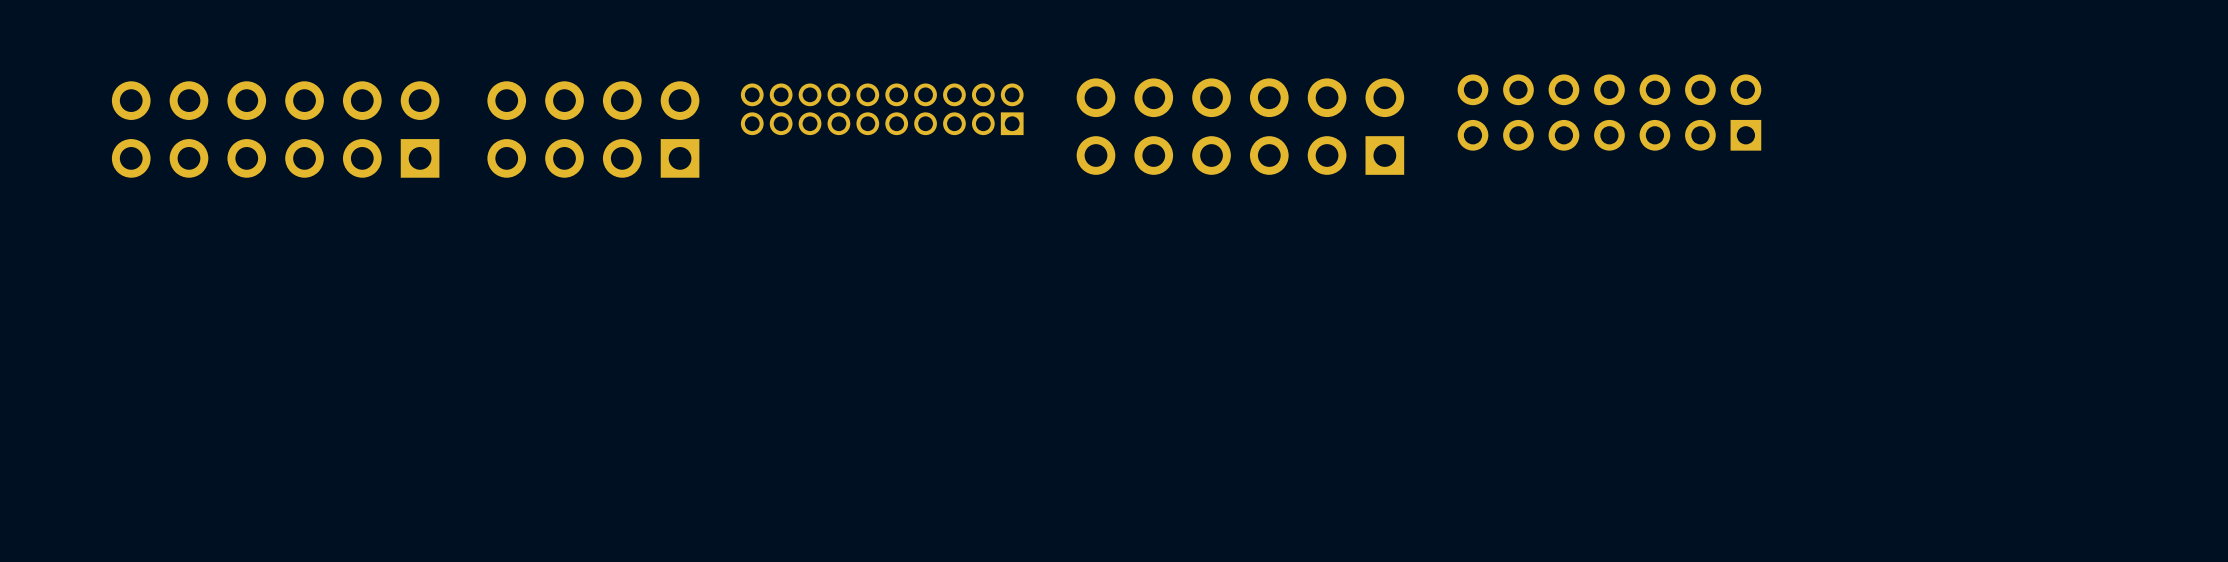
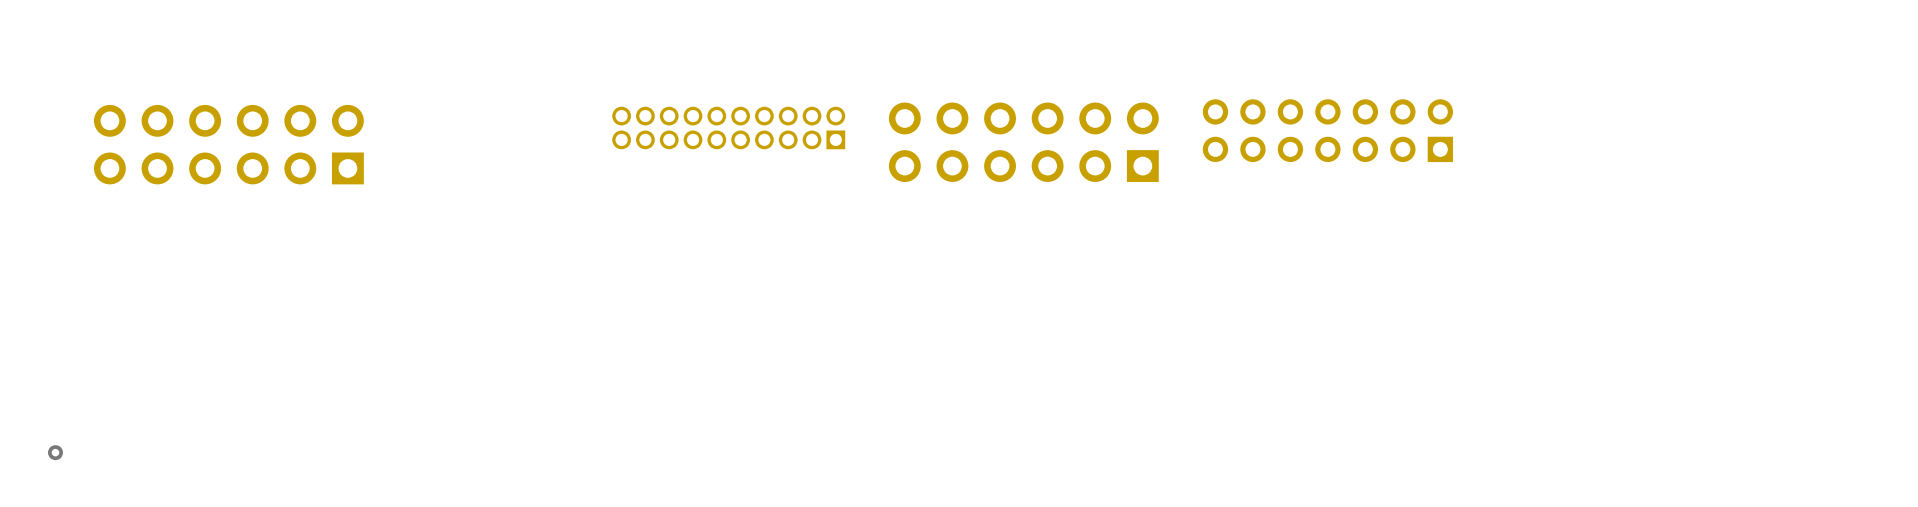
part: (593, 129) -> none
via: none -> (55, 452)

